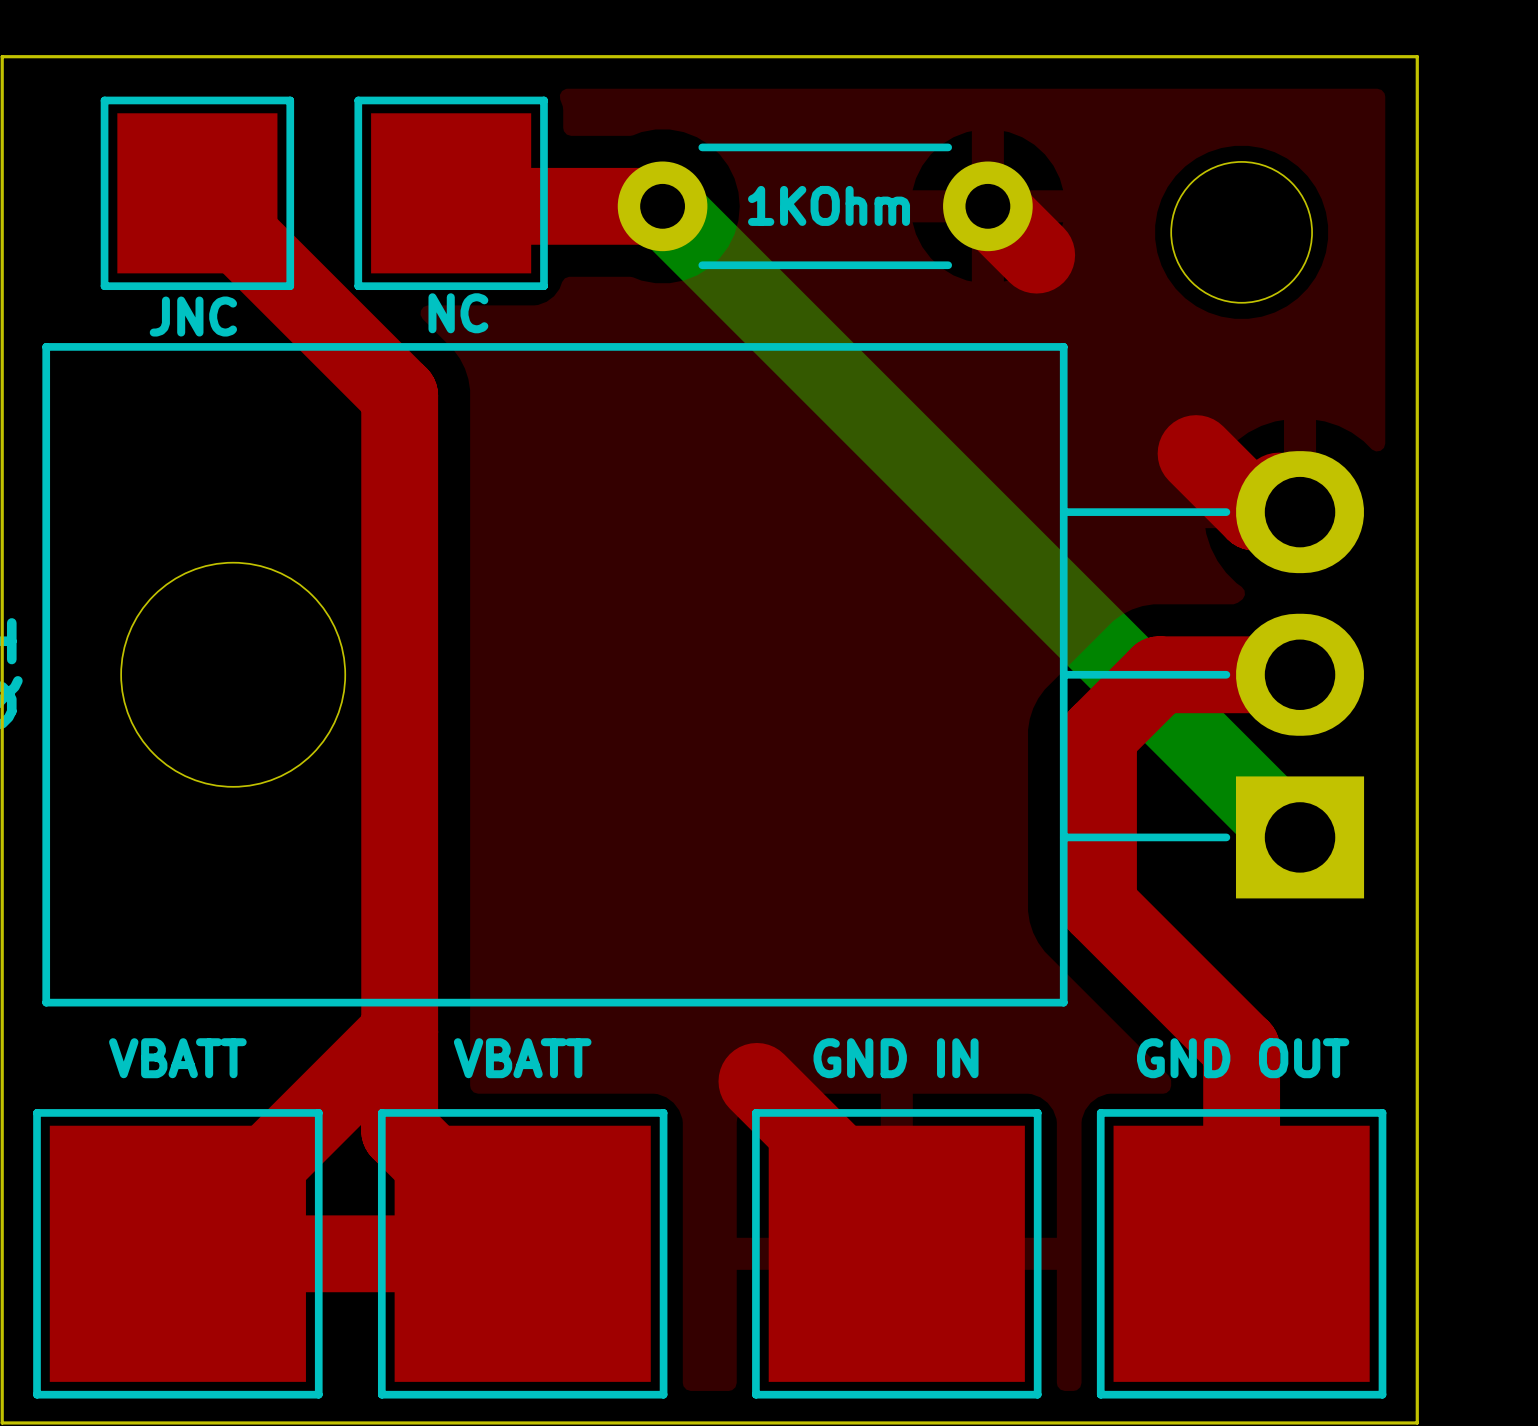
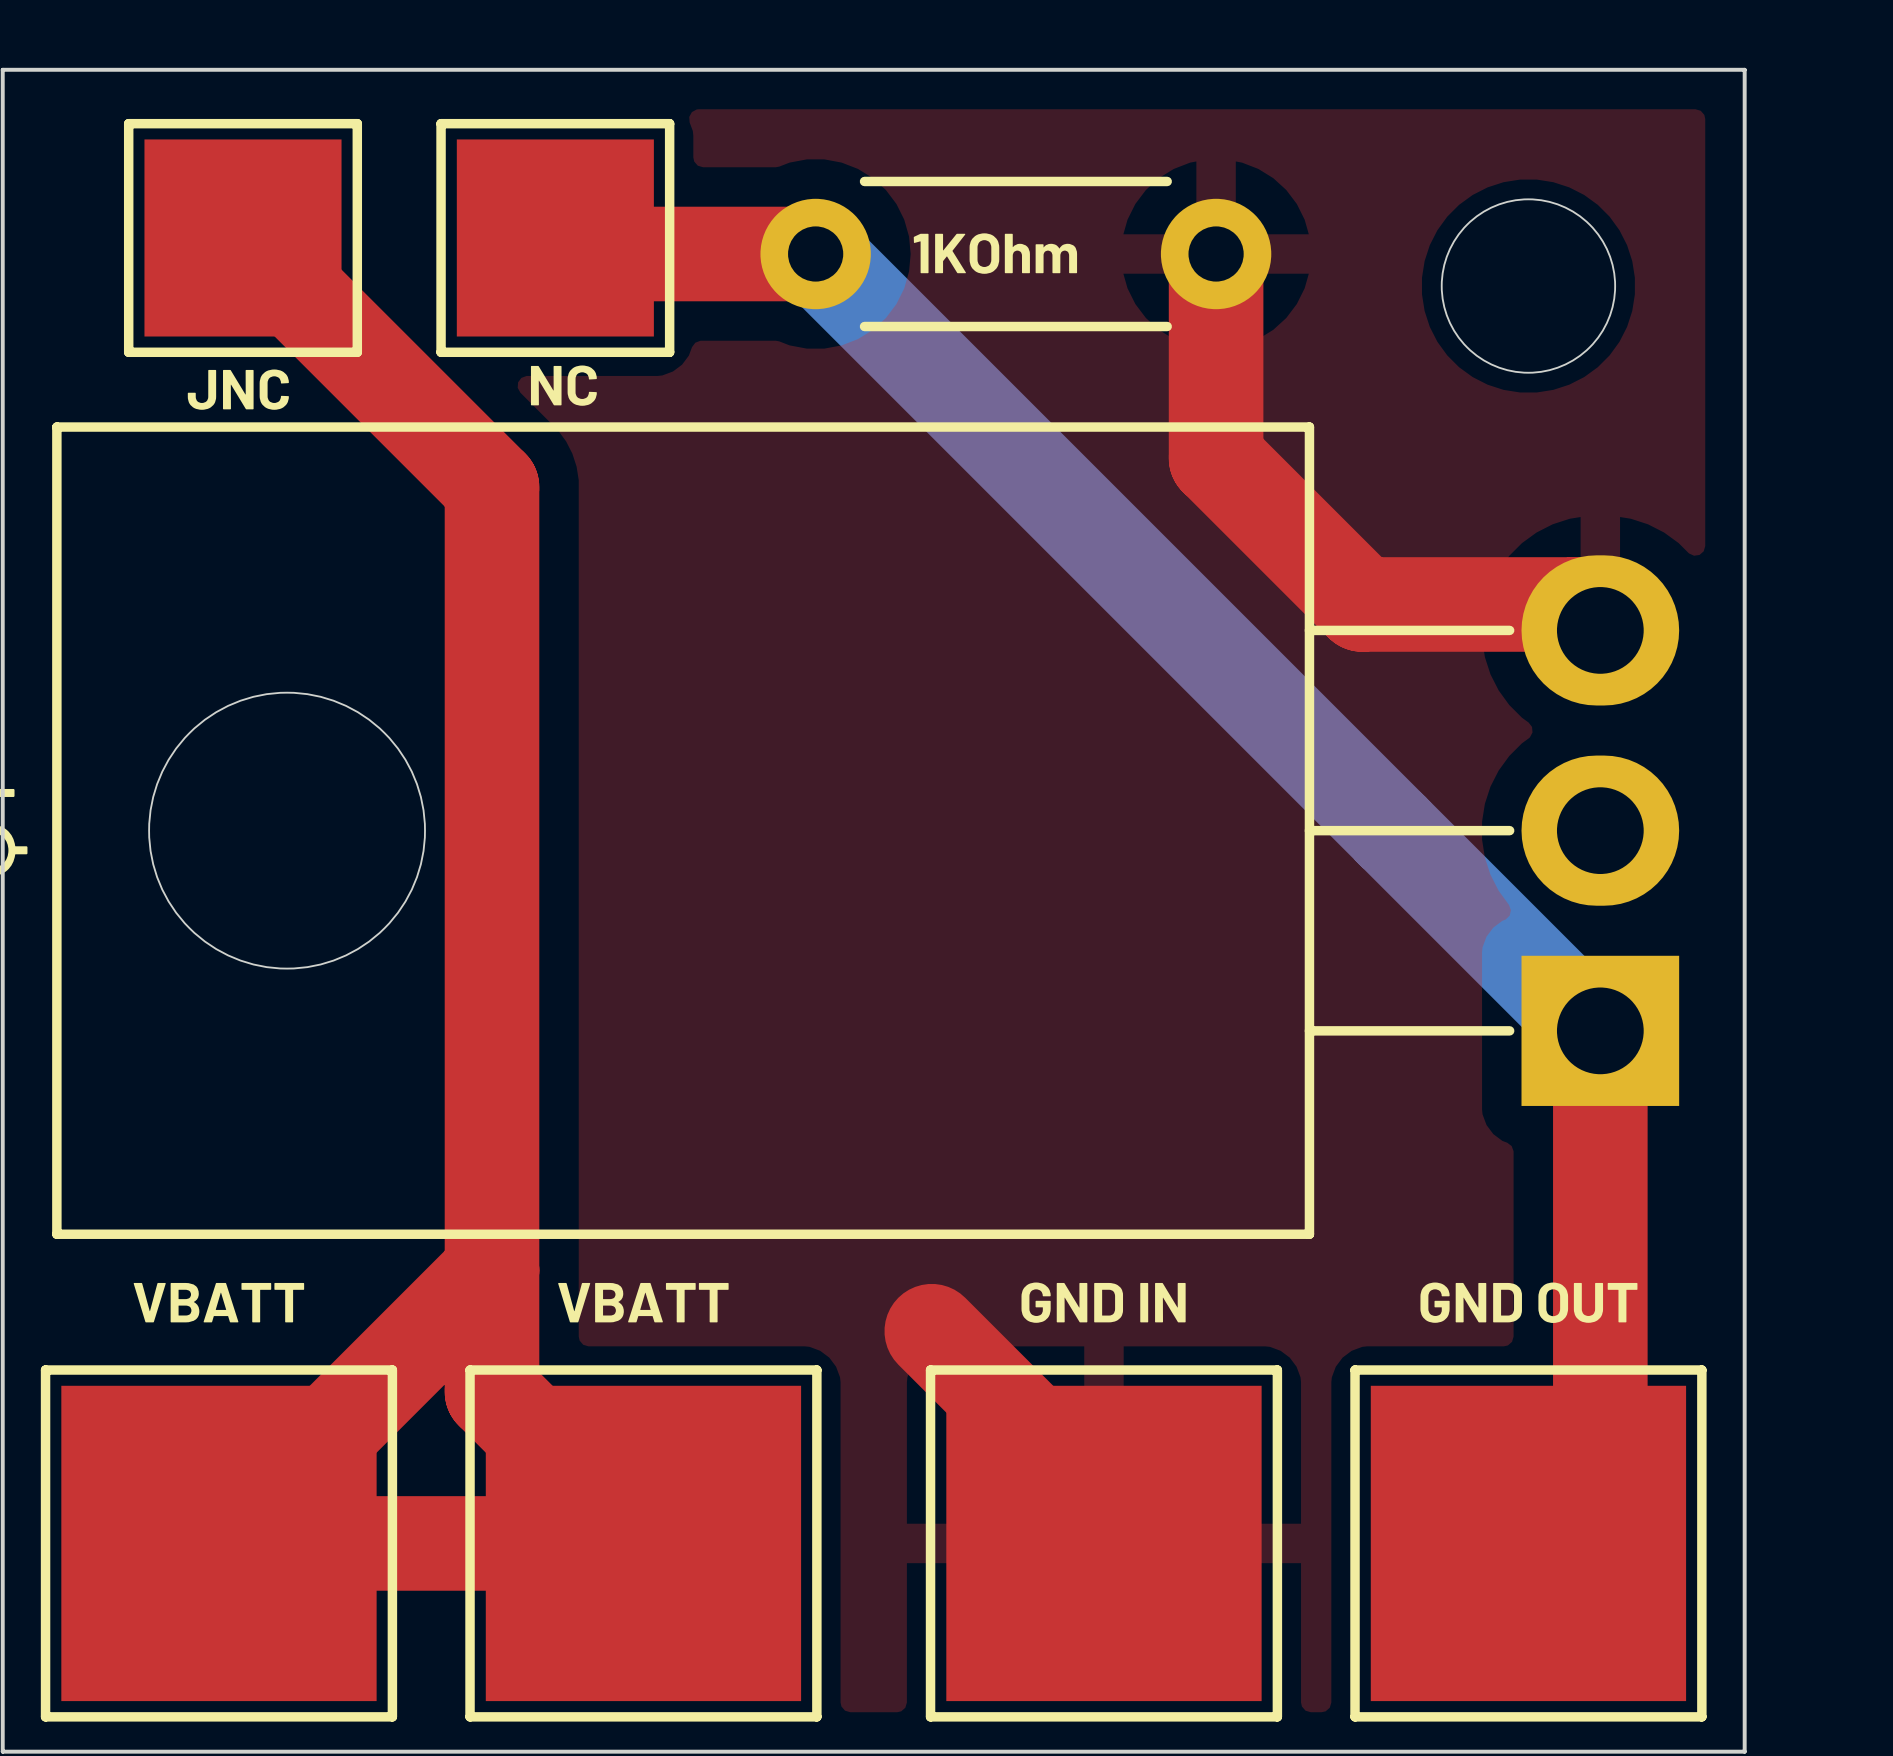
top track: (987, 206) (1036, 255) -> (1216, 253) (1216, 458) (1362, 604) (1574, 604)
top track: (1196, 453) (1254, 512) (1300, 512) -> none
top track: (1300, 674) (1159, 674) (1098, 735) (1098, 905) (1241, 1048) (1241, 1253) -> none
top track: none -> (1600, 1030) (1600, 1471)

